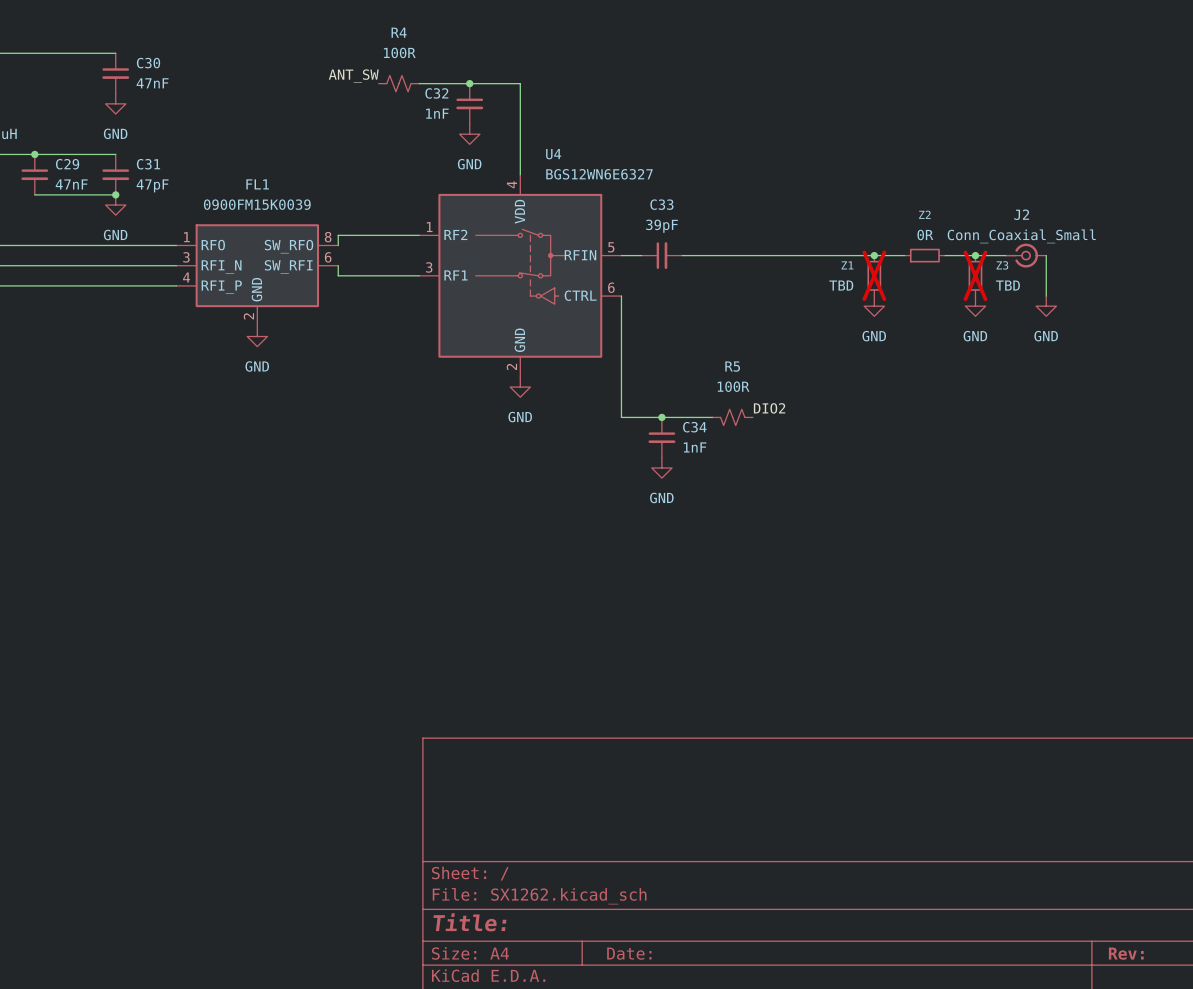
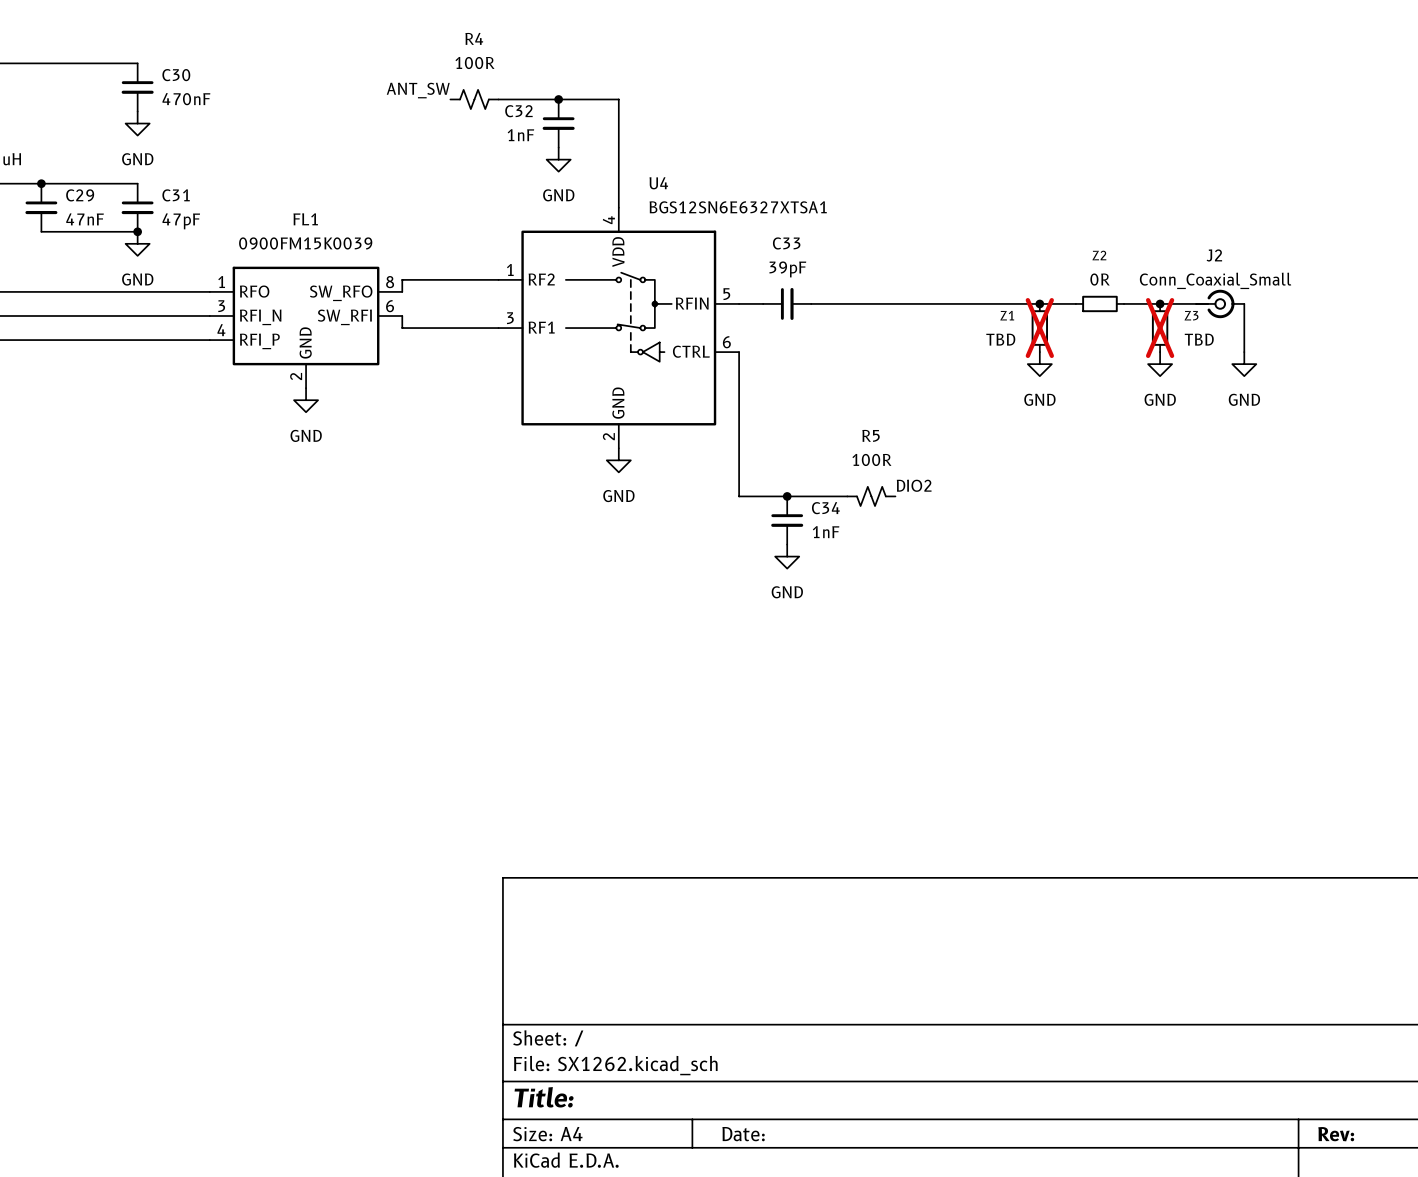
C30 value: 47nF (152, 83) -> 470nF (186, 99)
U4 value: BGS12WN6E6327 (599, 174) -> BGS12SN6E6327XTSA1 (738, 207)

